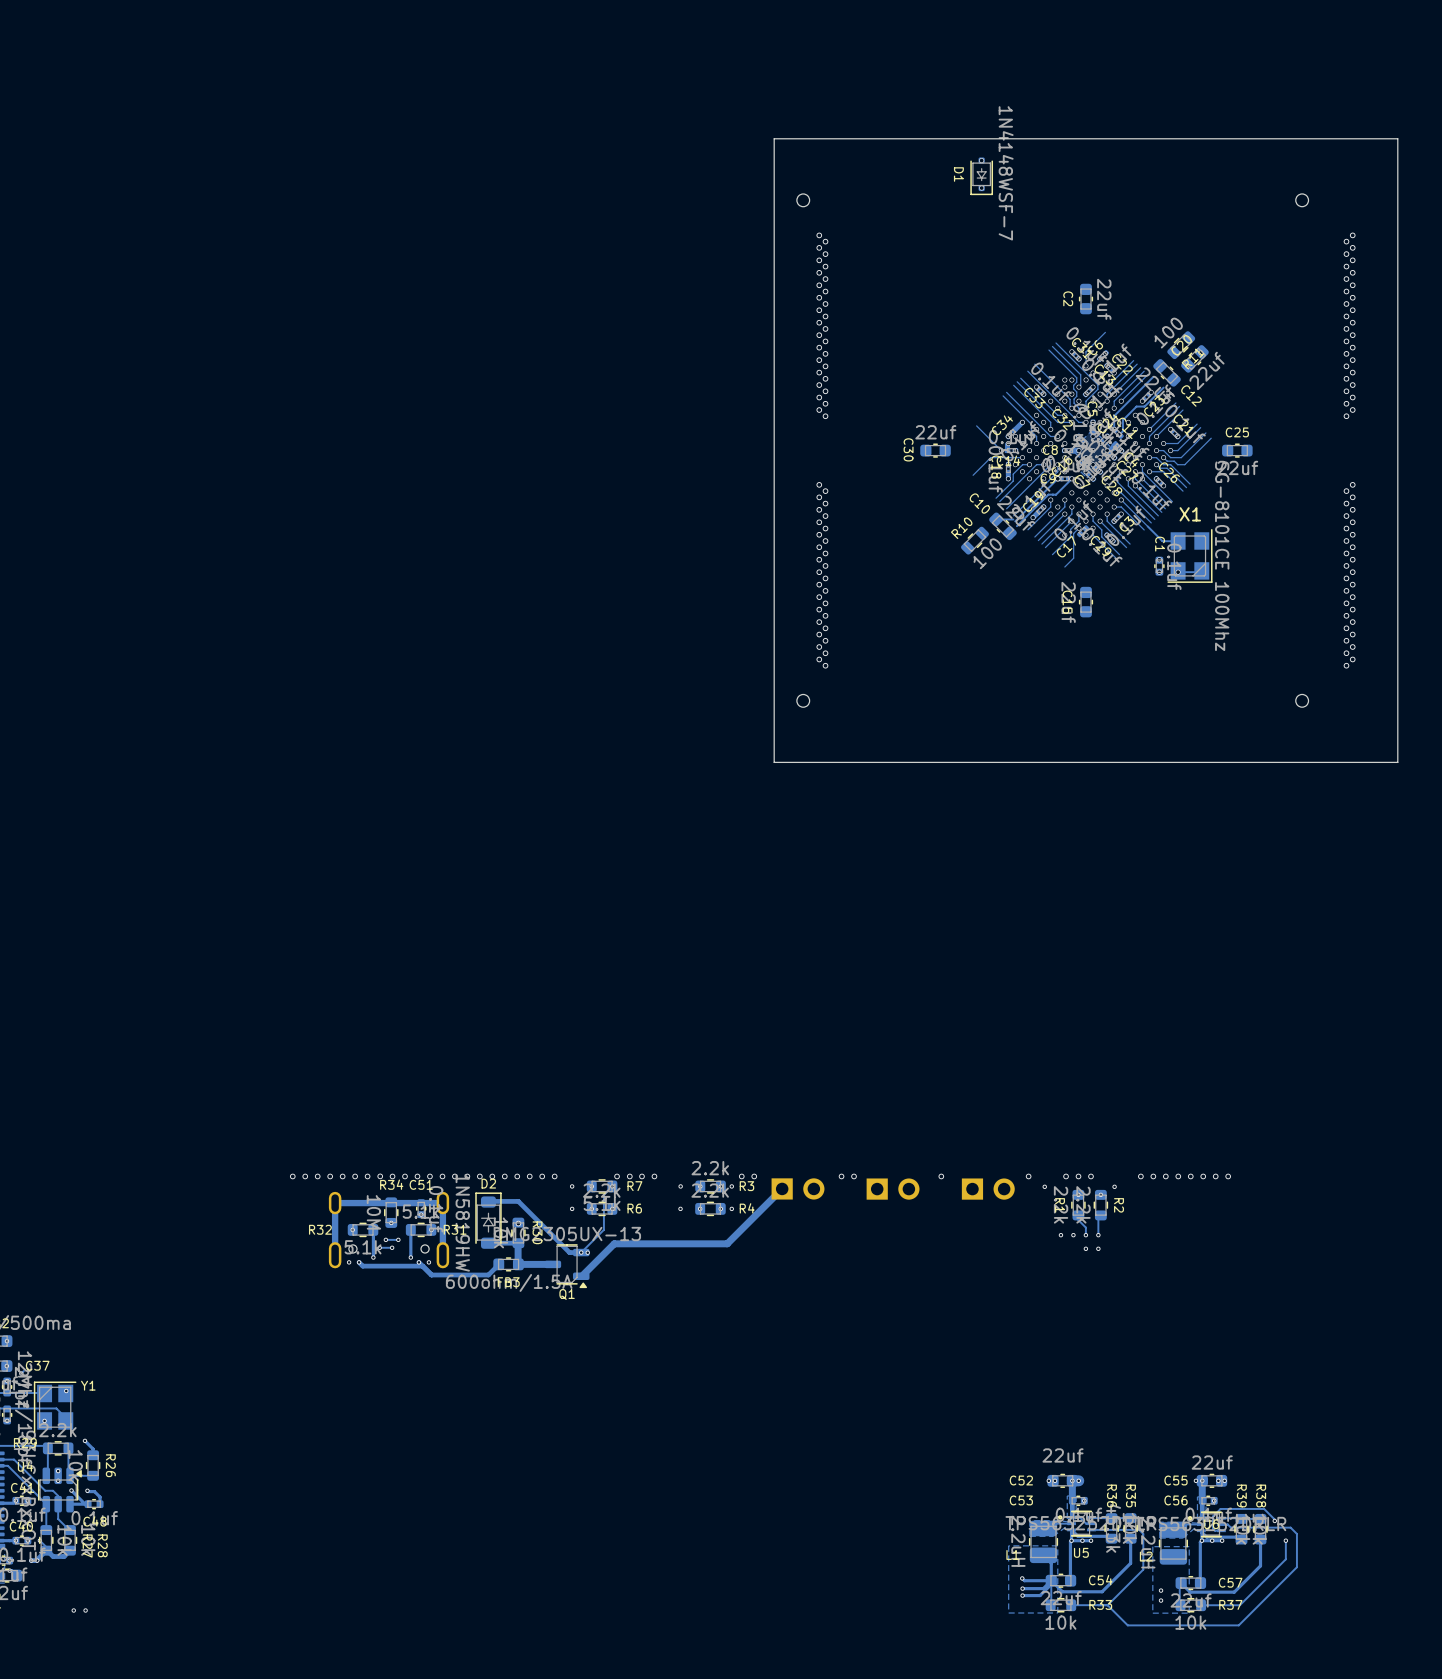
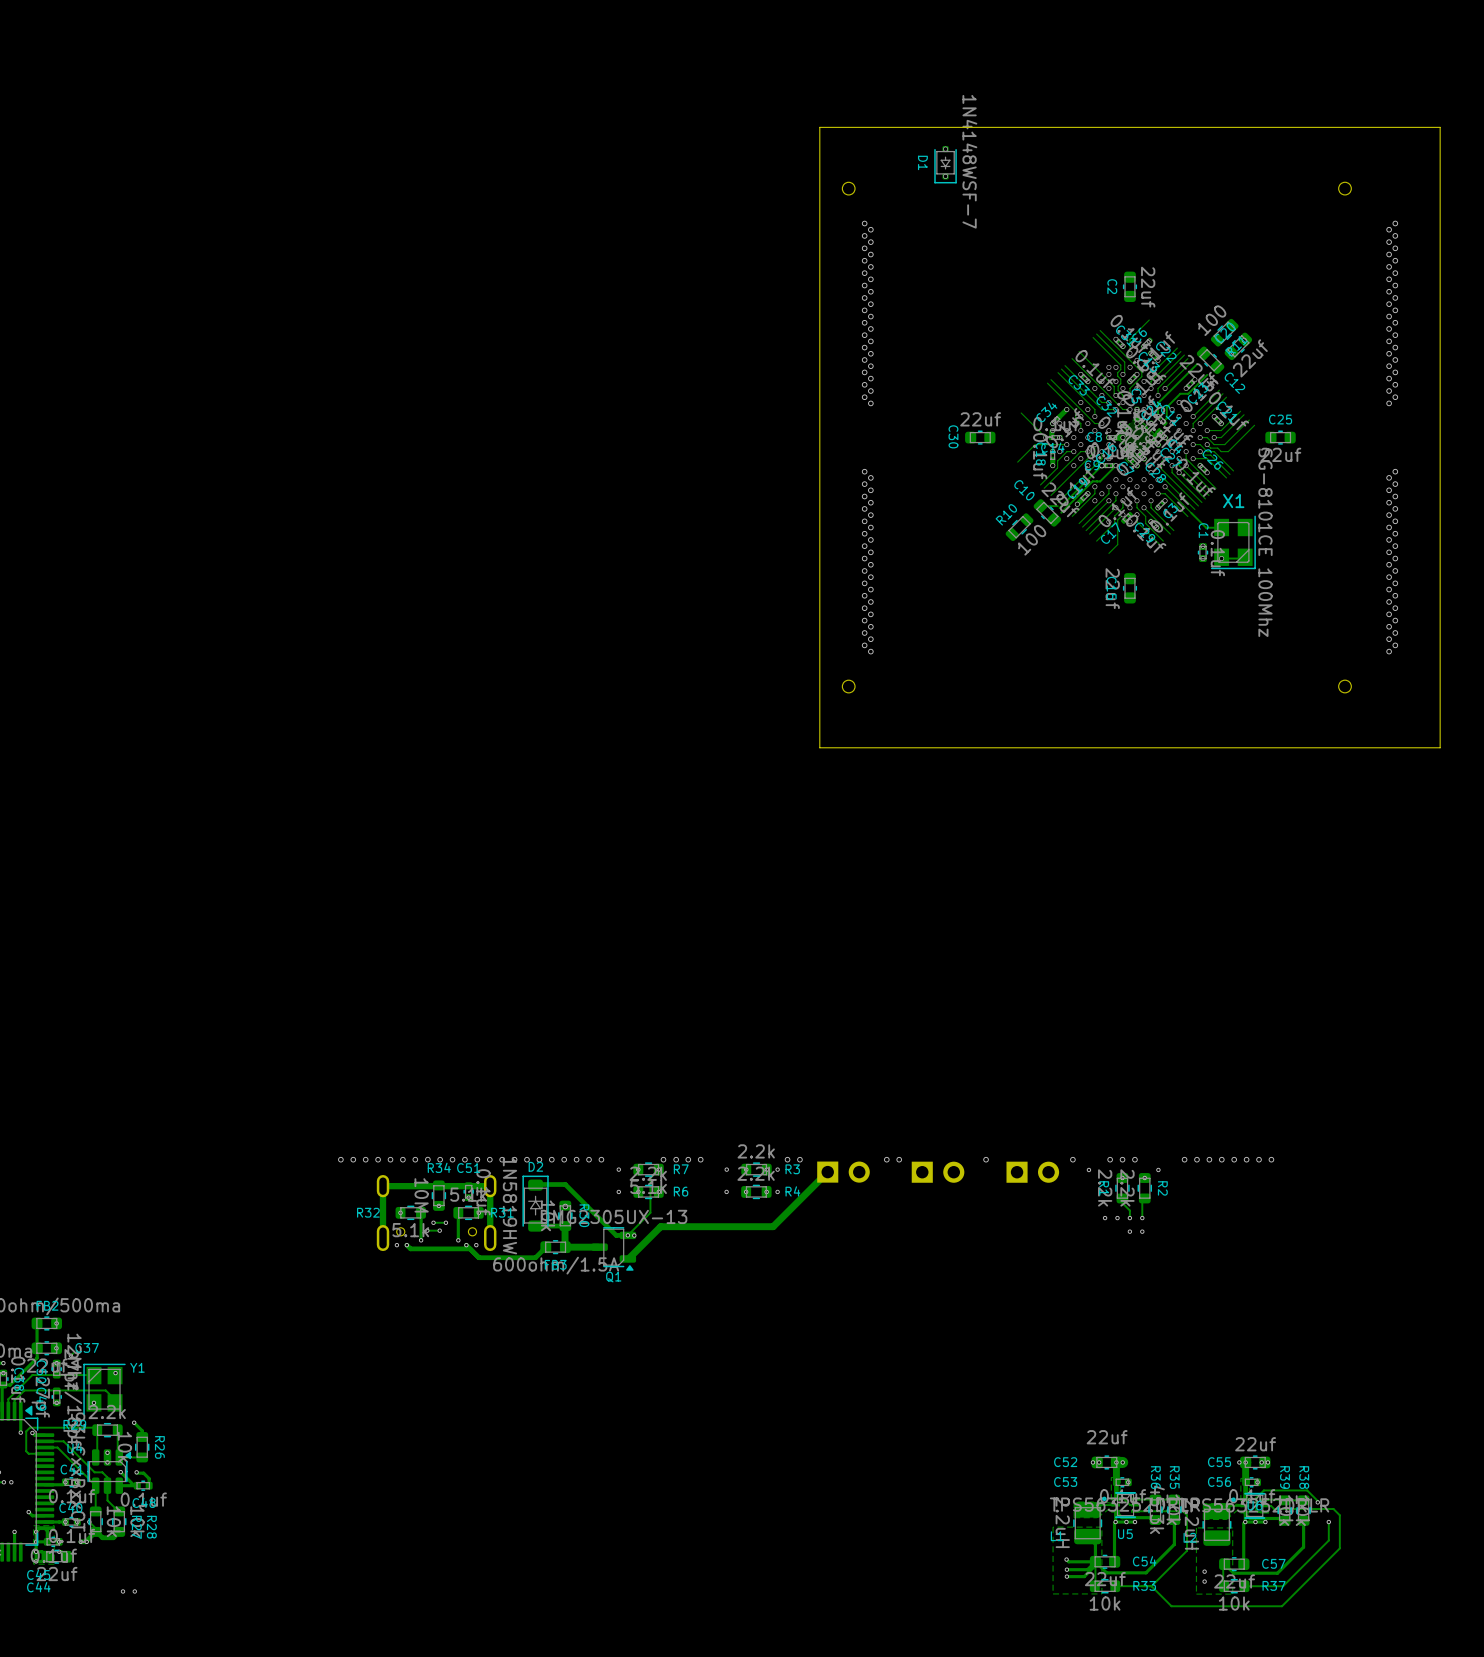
via: none -> (945, 149)
via: (981, 160) -> none
D1 position: (981, 176) -> (945, 164)
via: none -> (945, 176)
via: (981, 188) -> none

